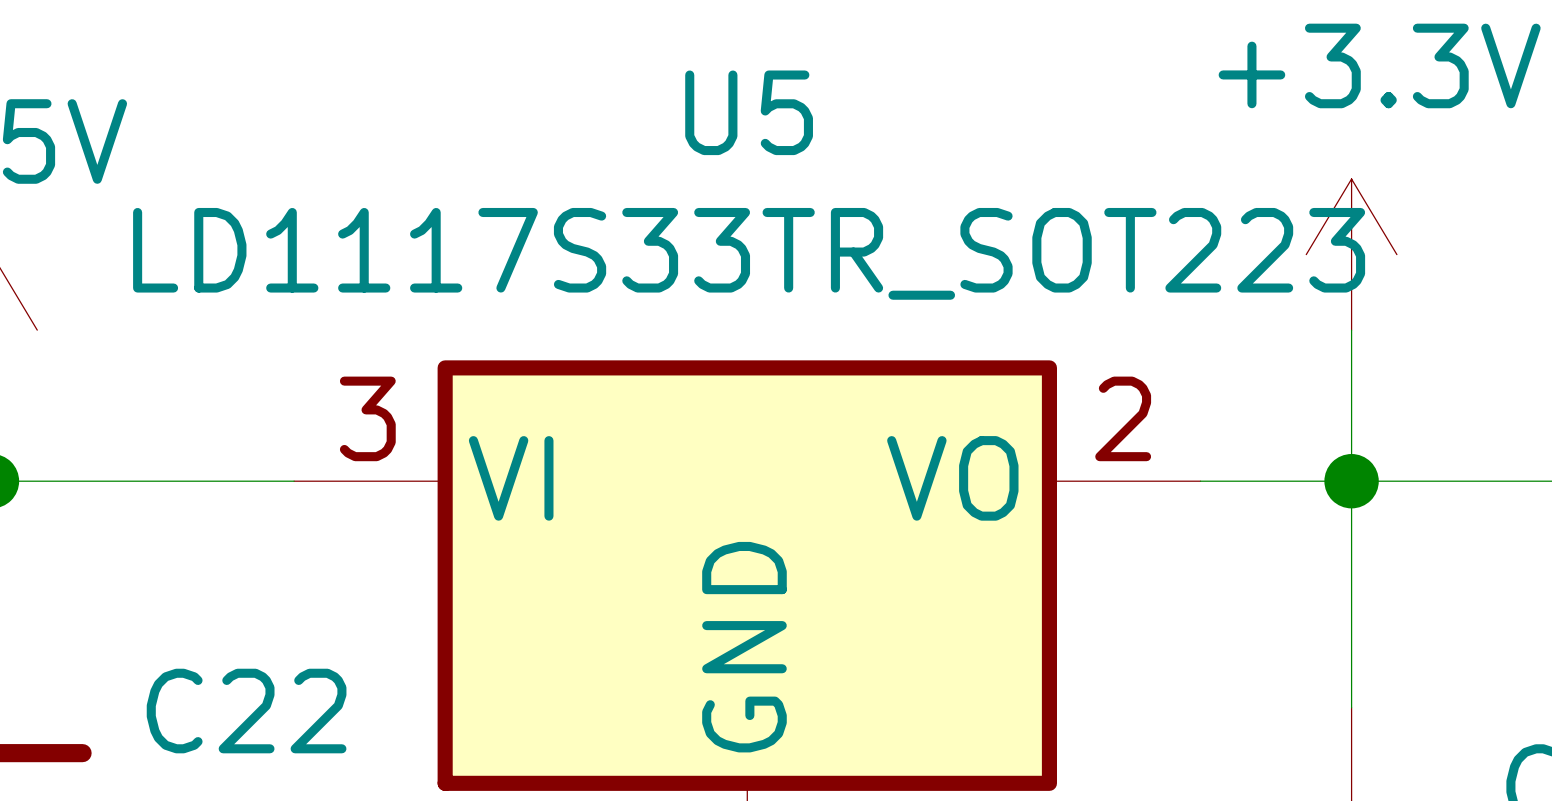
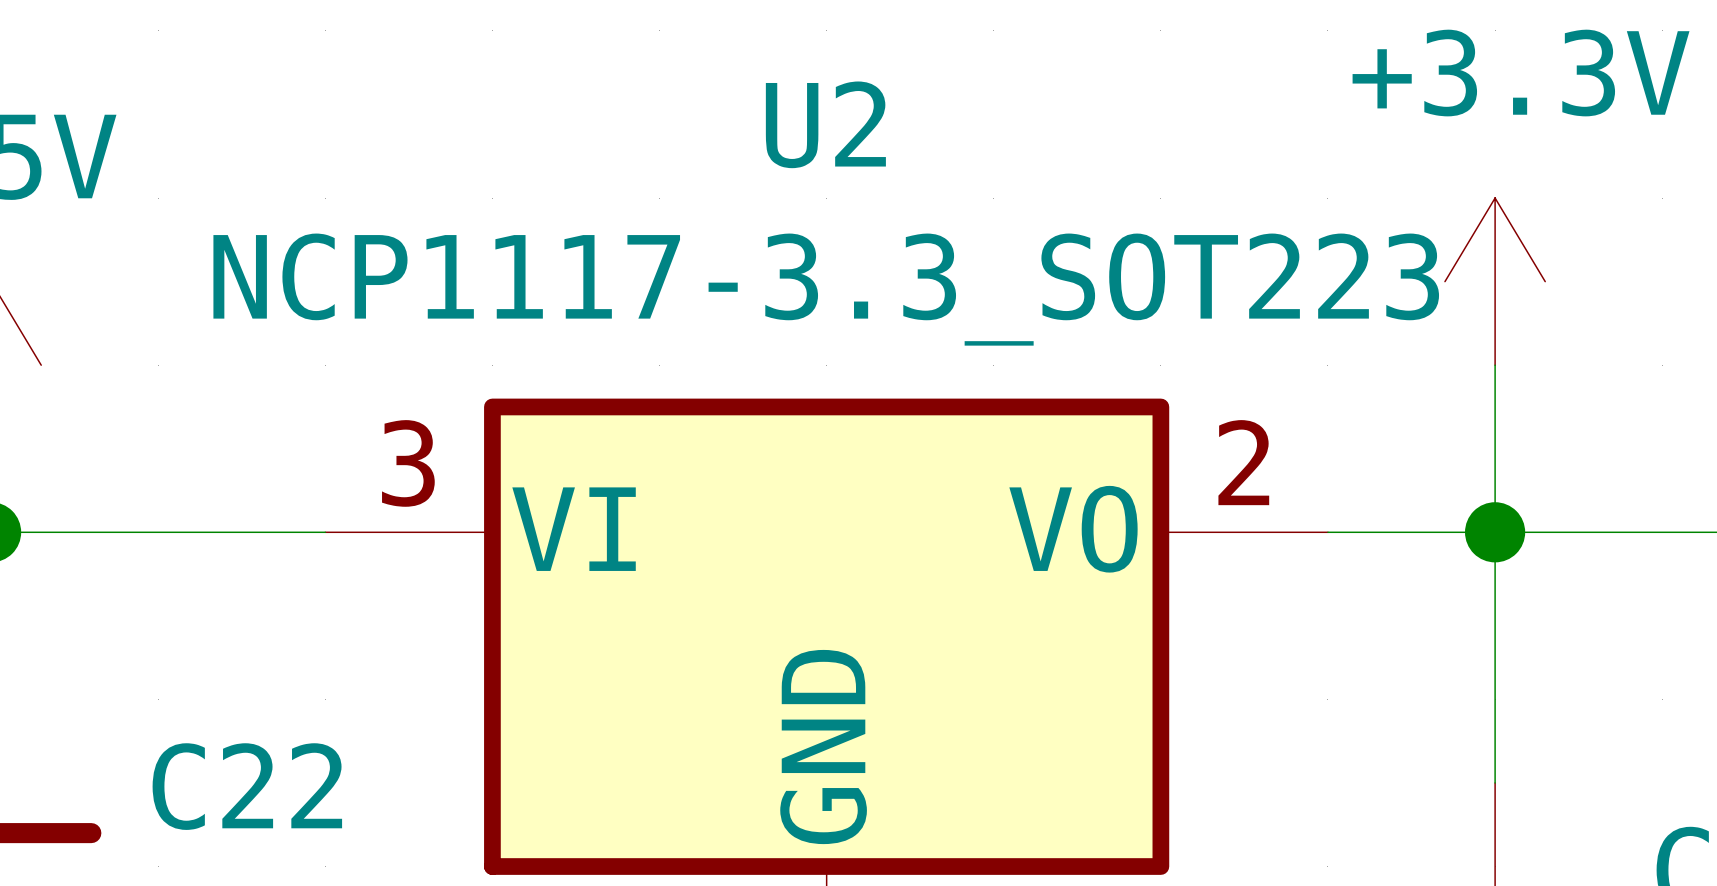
U5 name: U5 (749, 112) -> U2 (825, 124)
U5 value: LD1117S33TR_SOT223 (749, 253) -> NCP1117-3.3_SOT223 (826, 289)

